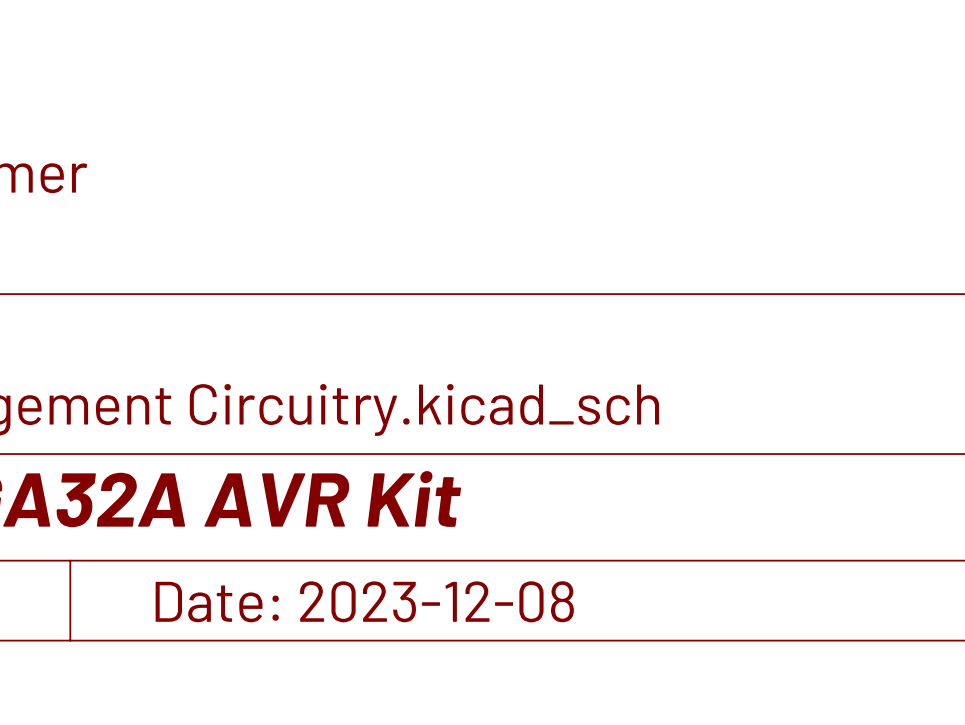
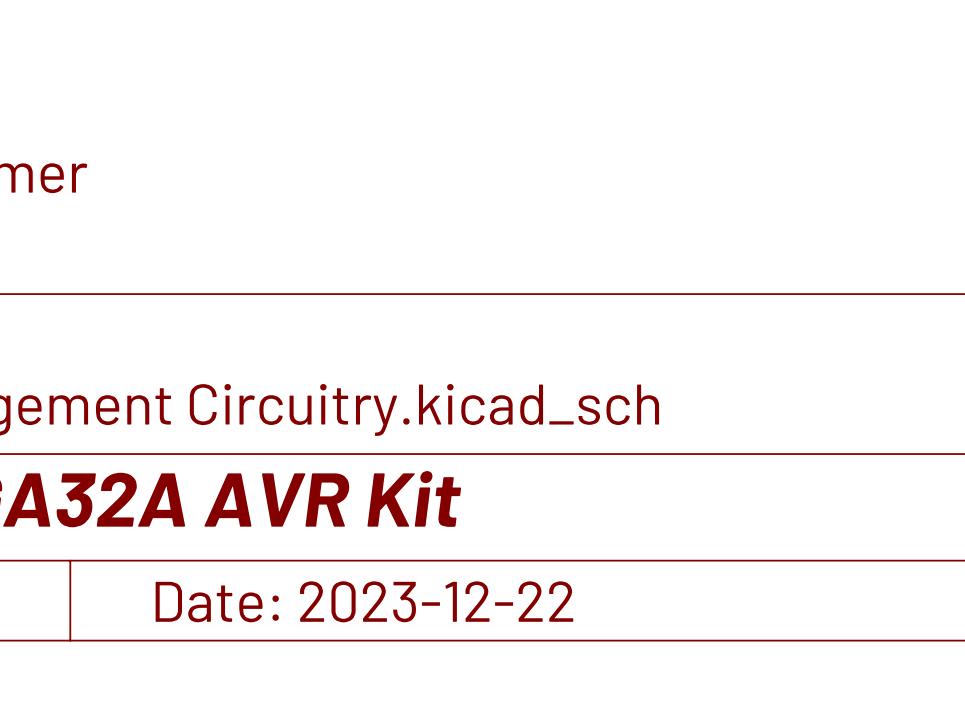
title block: Date: 2023-12-08 (364, 601) -> Date: 2023-12-22 (364, 601)

